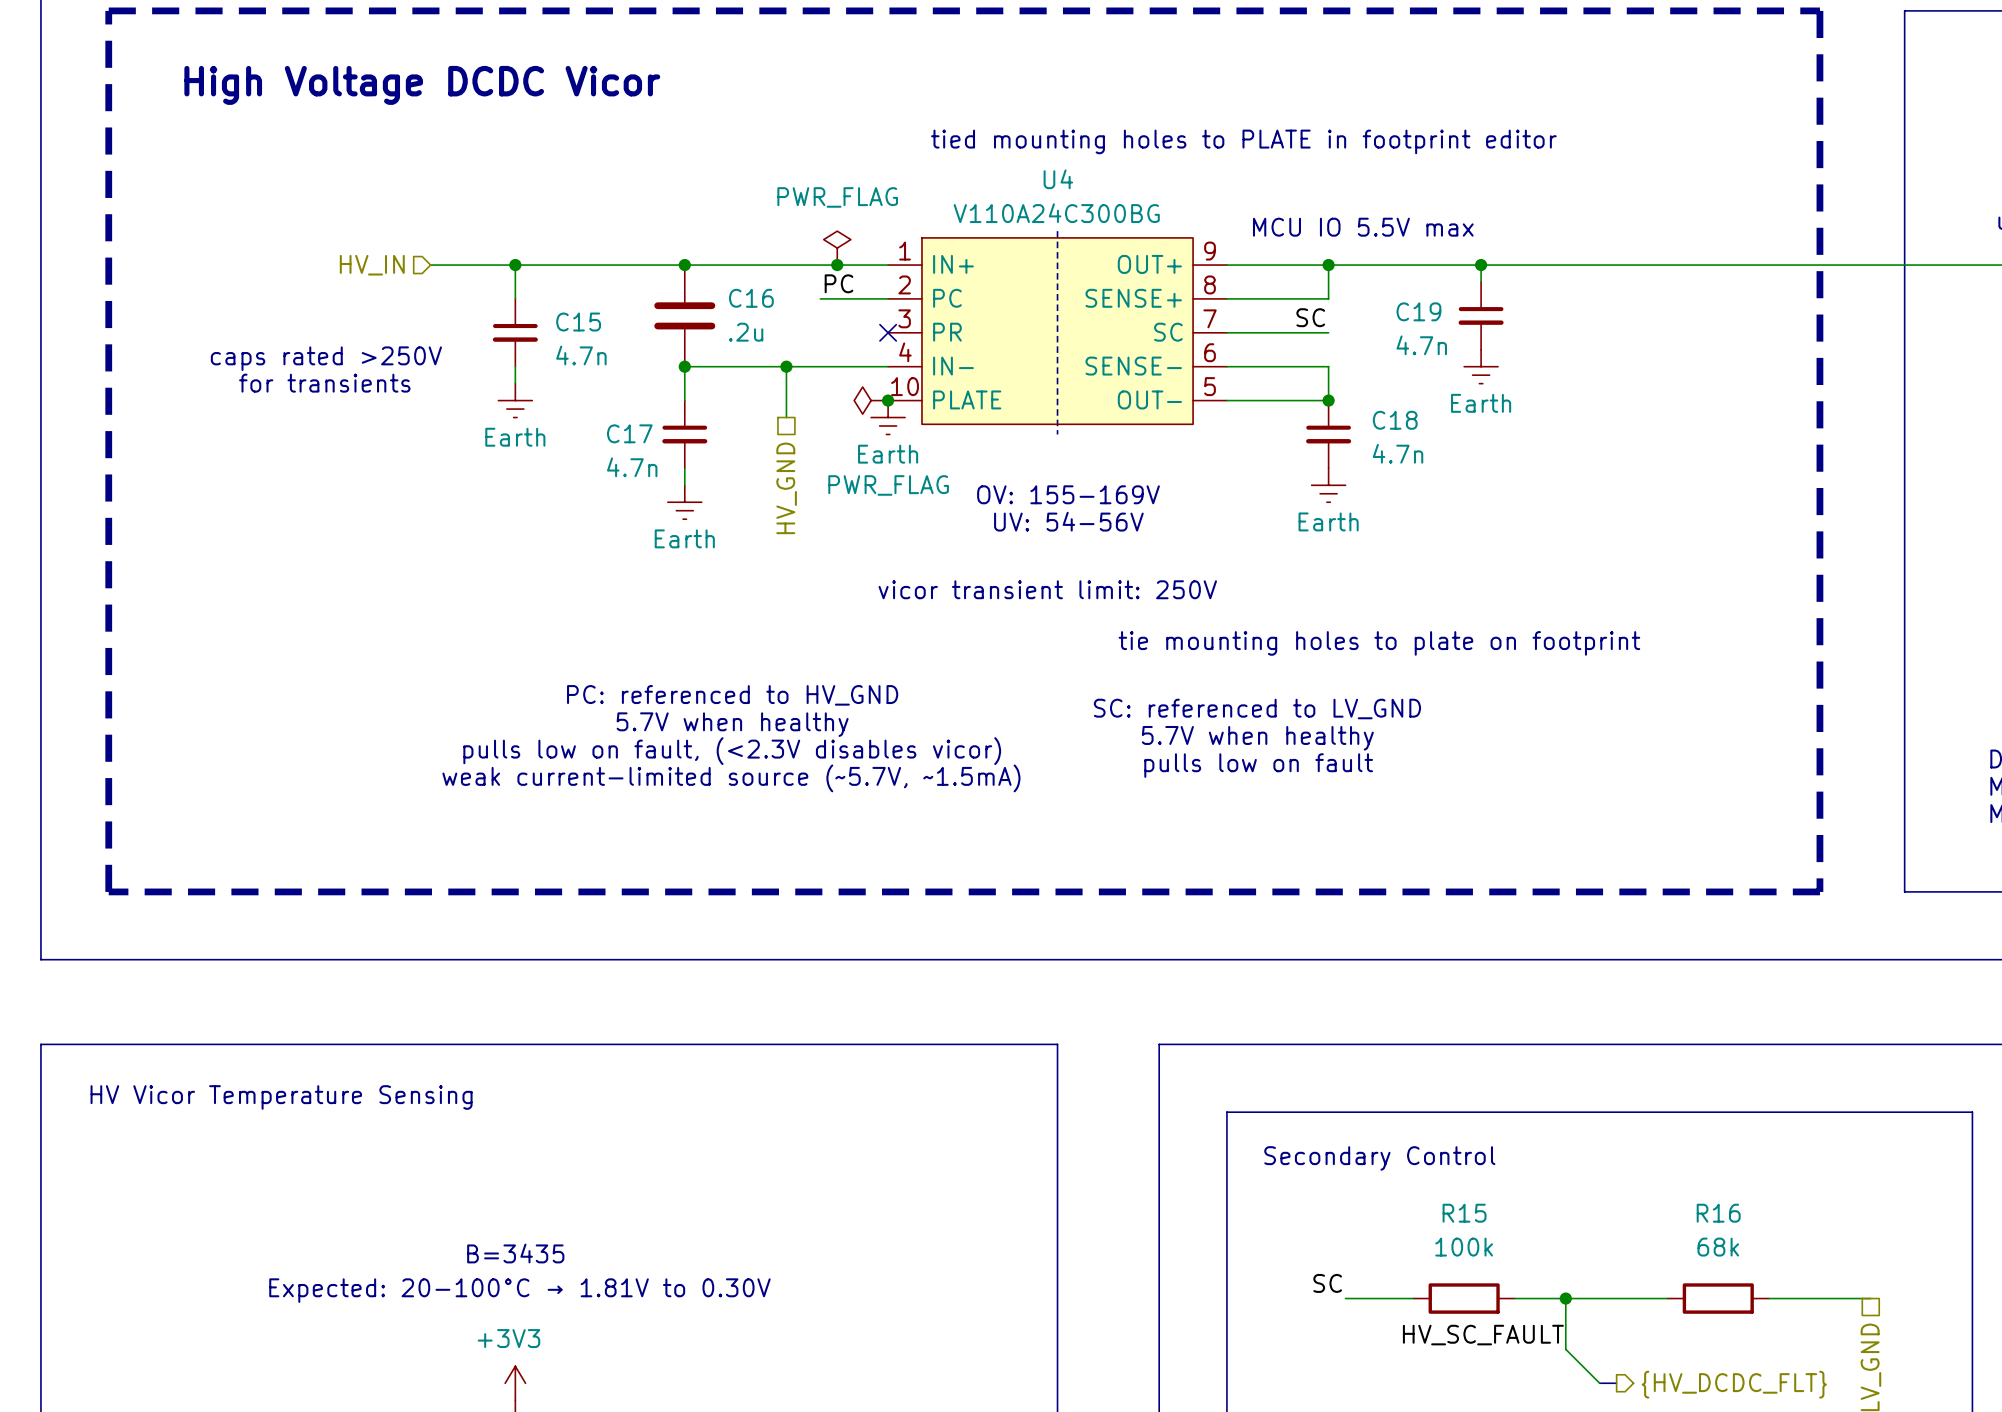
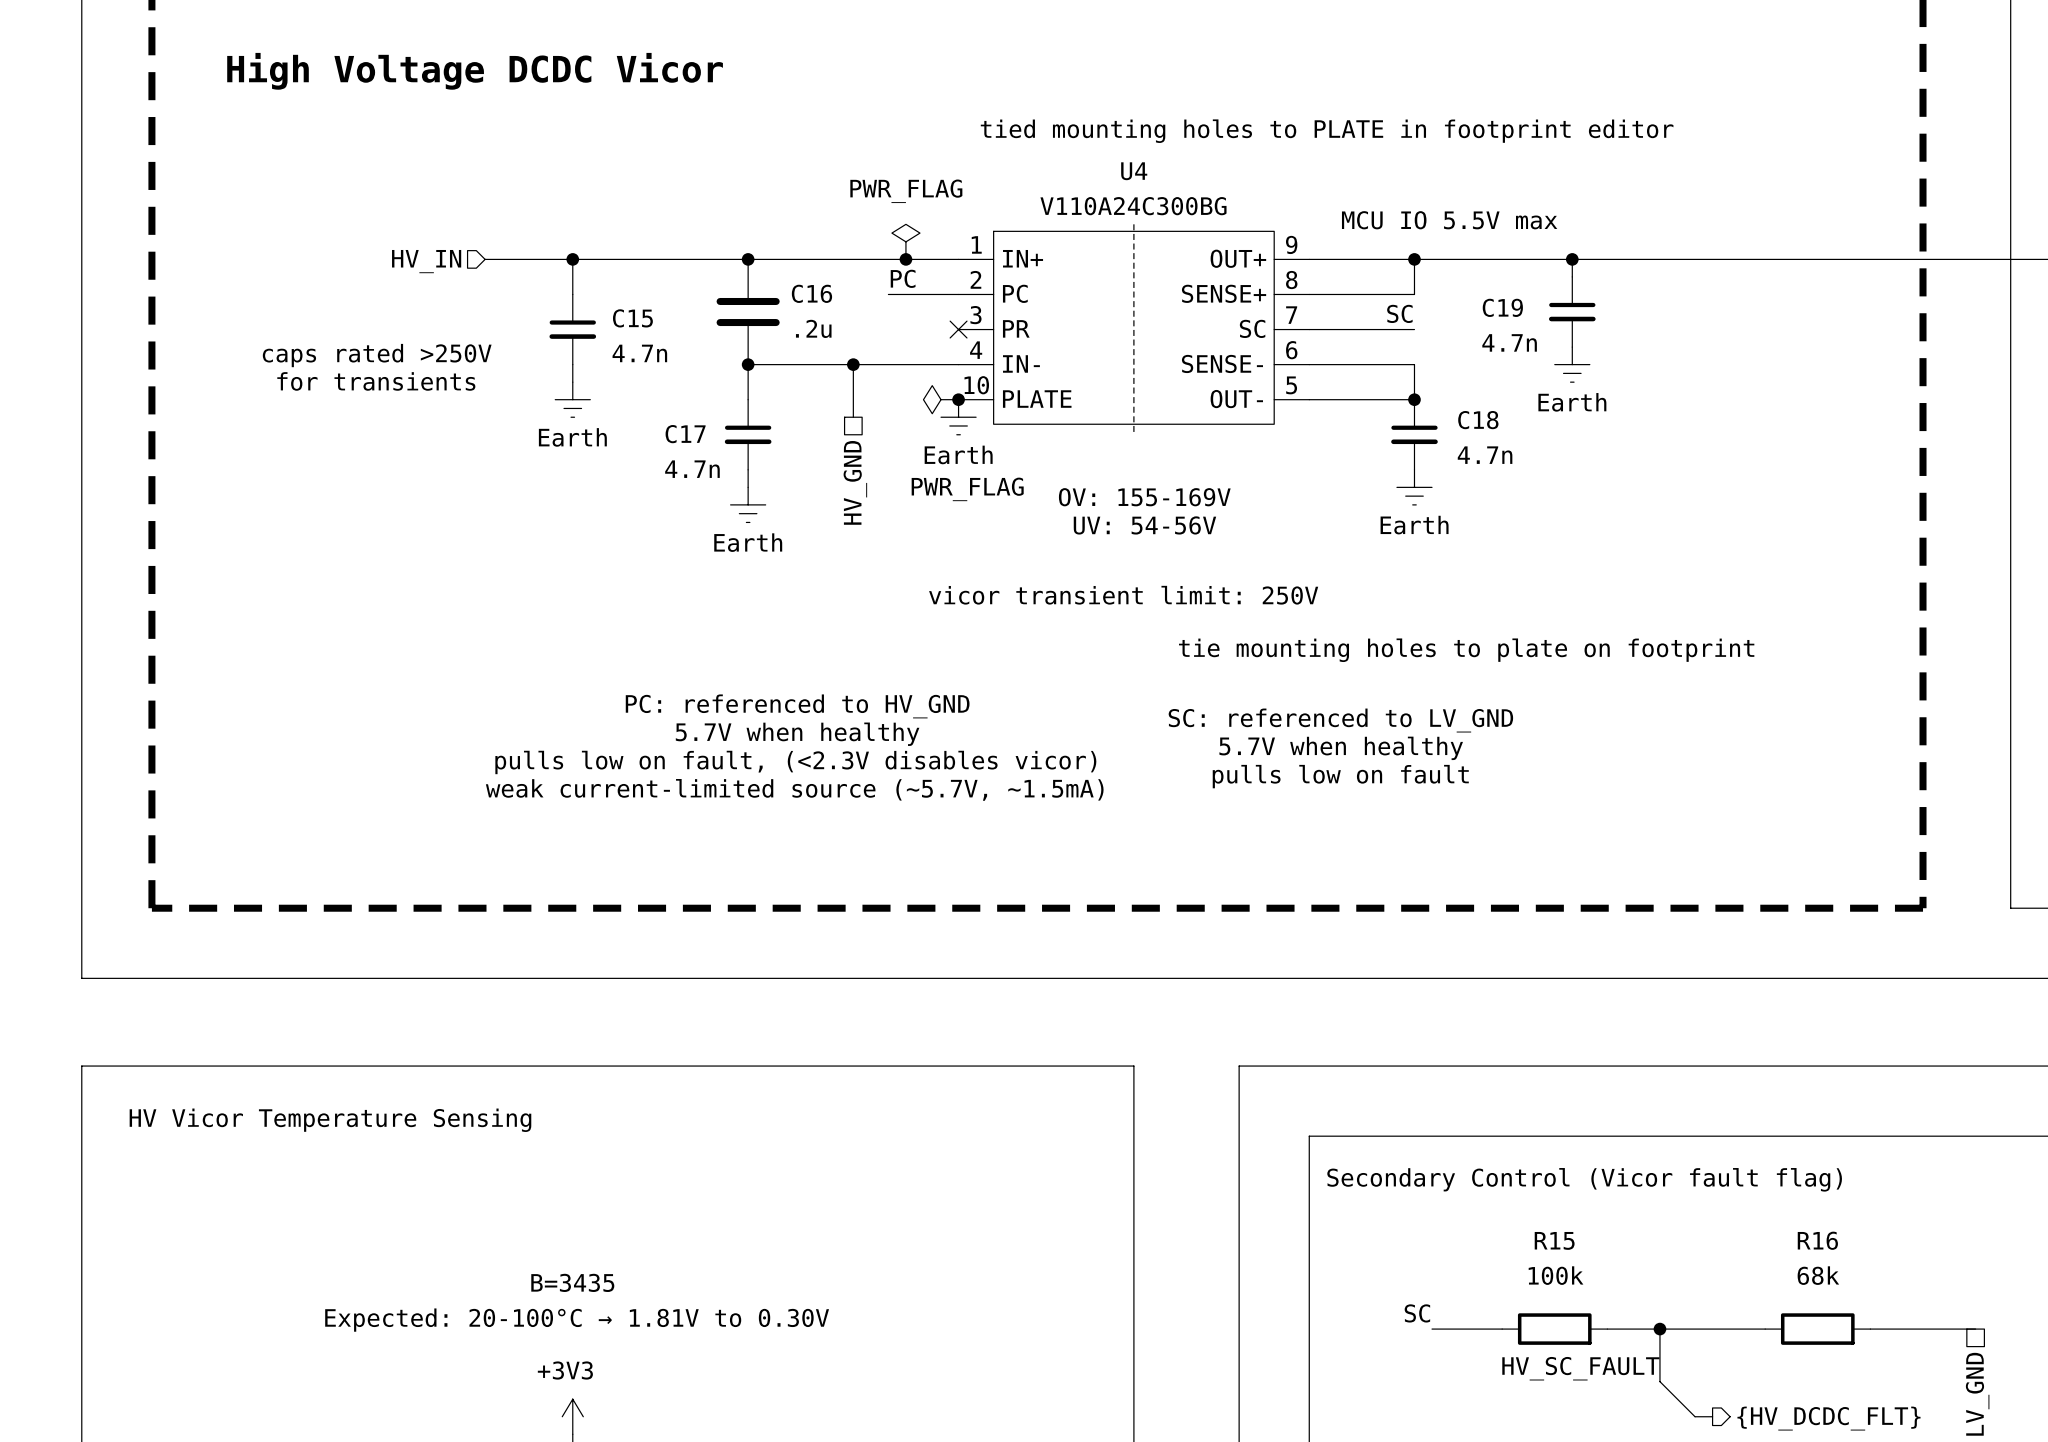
text: Secondary Control (1379, 1158) -> Secondary Control (Vicor fault flag) (1584, 1179)

